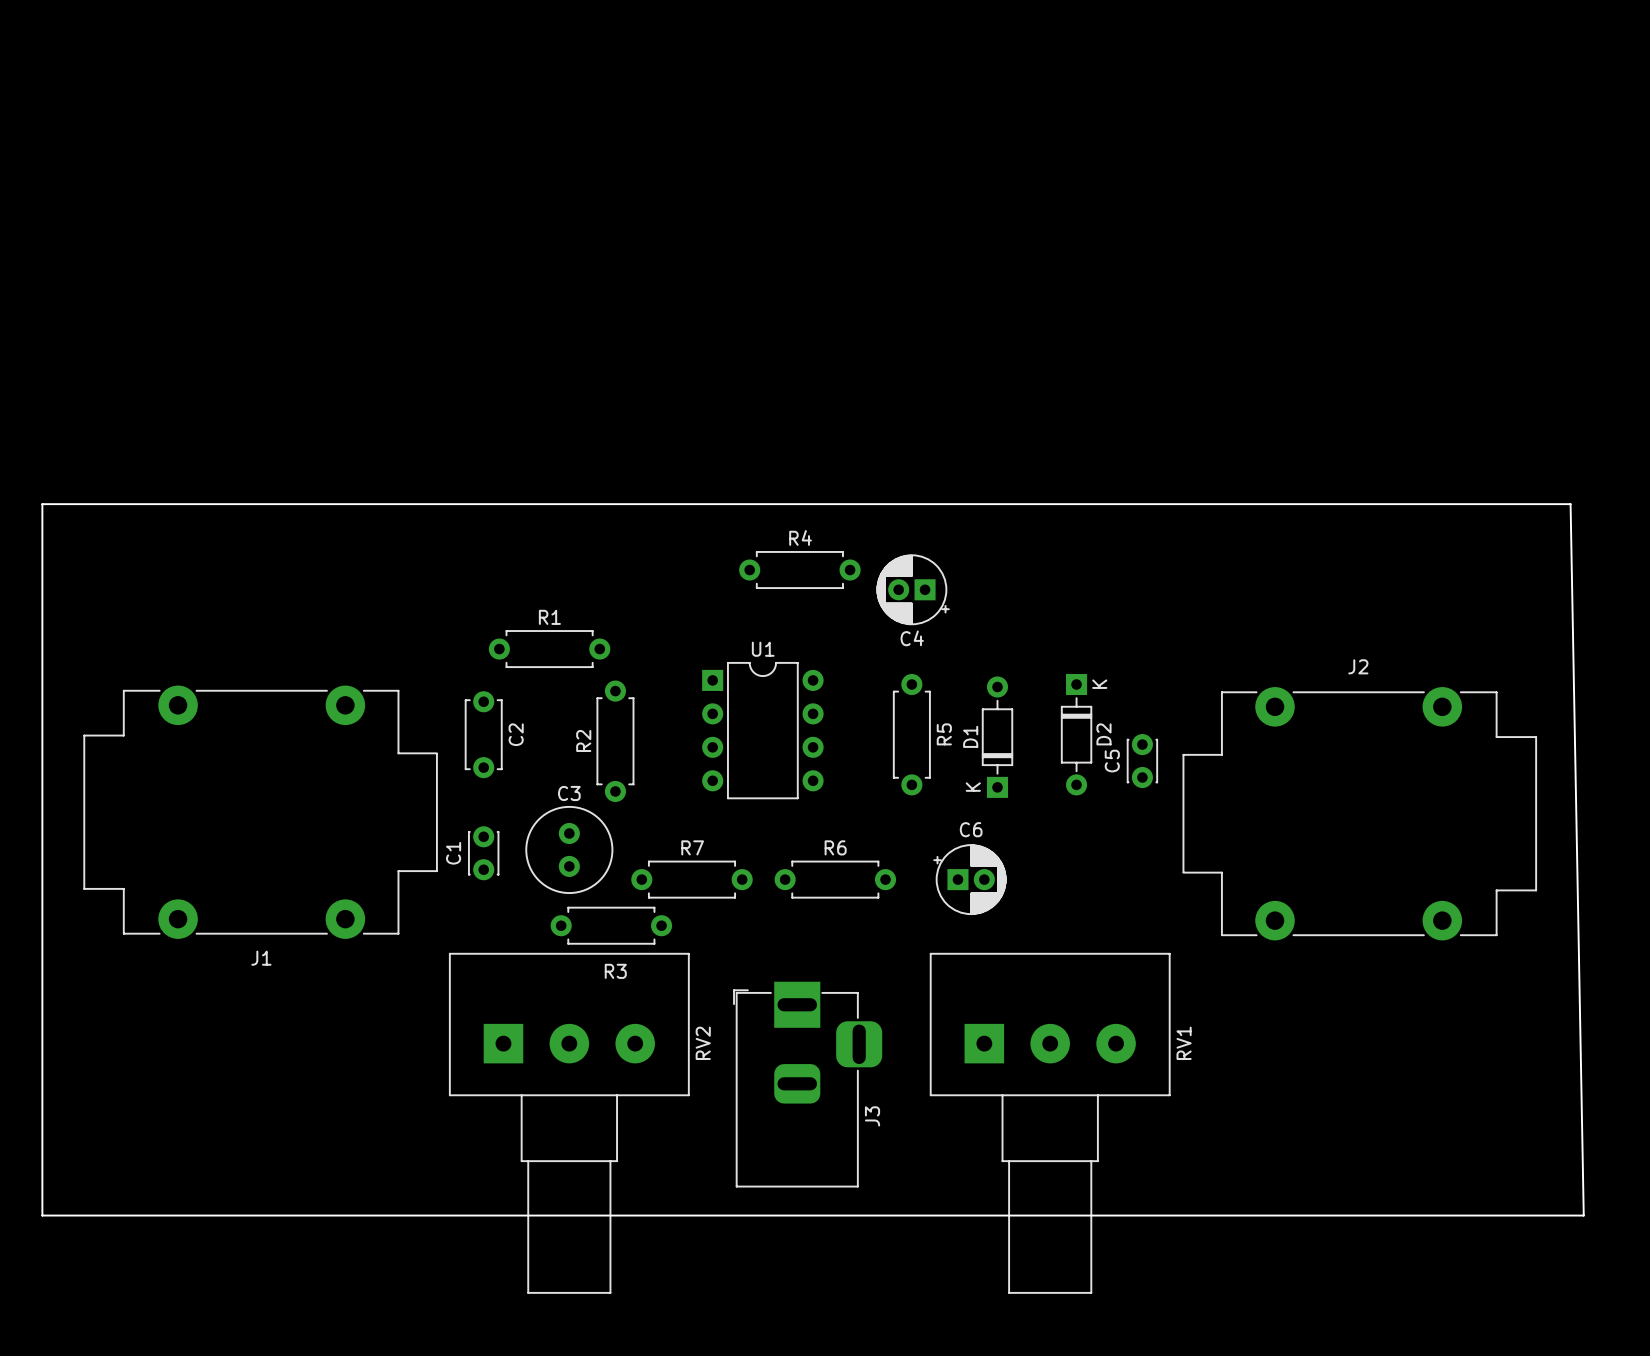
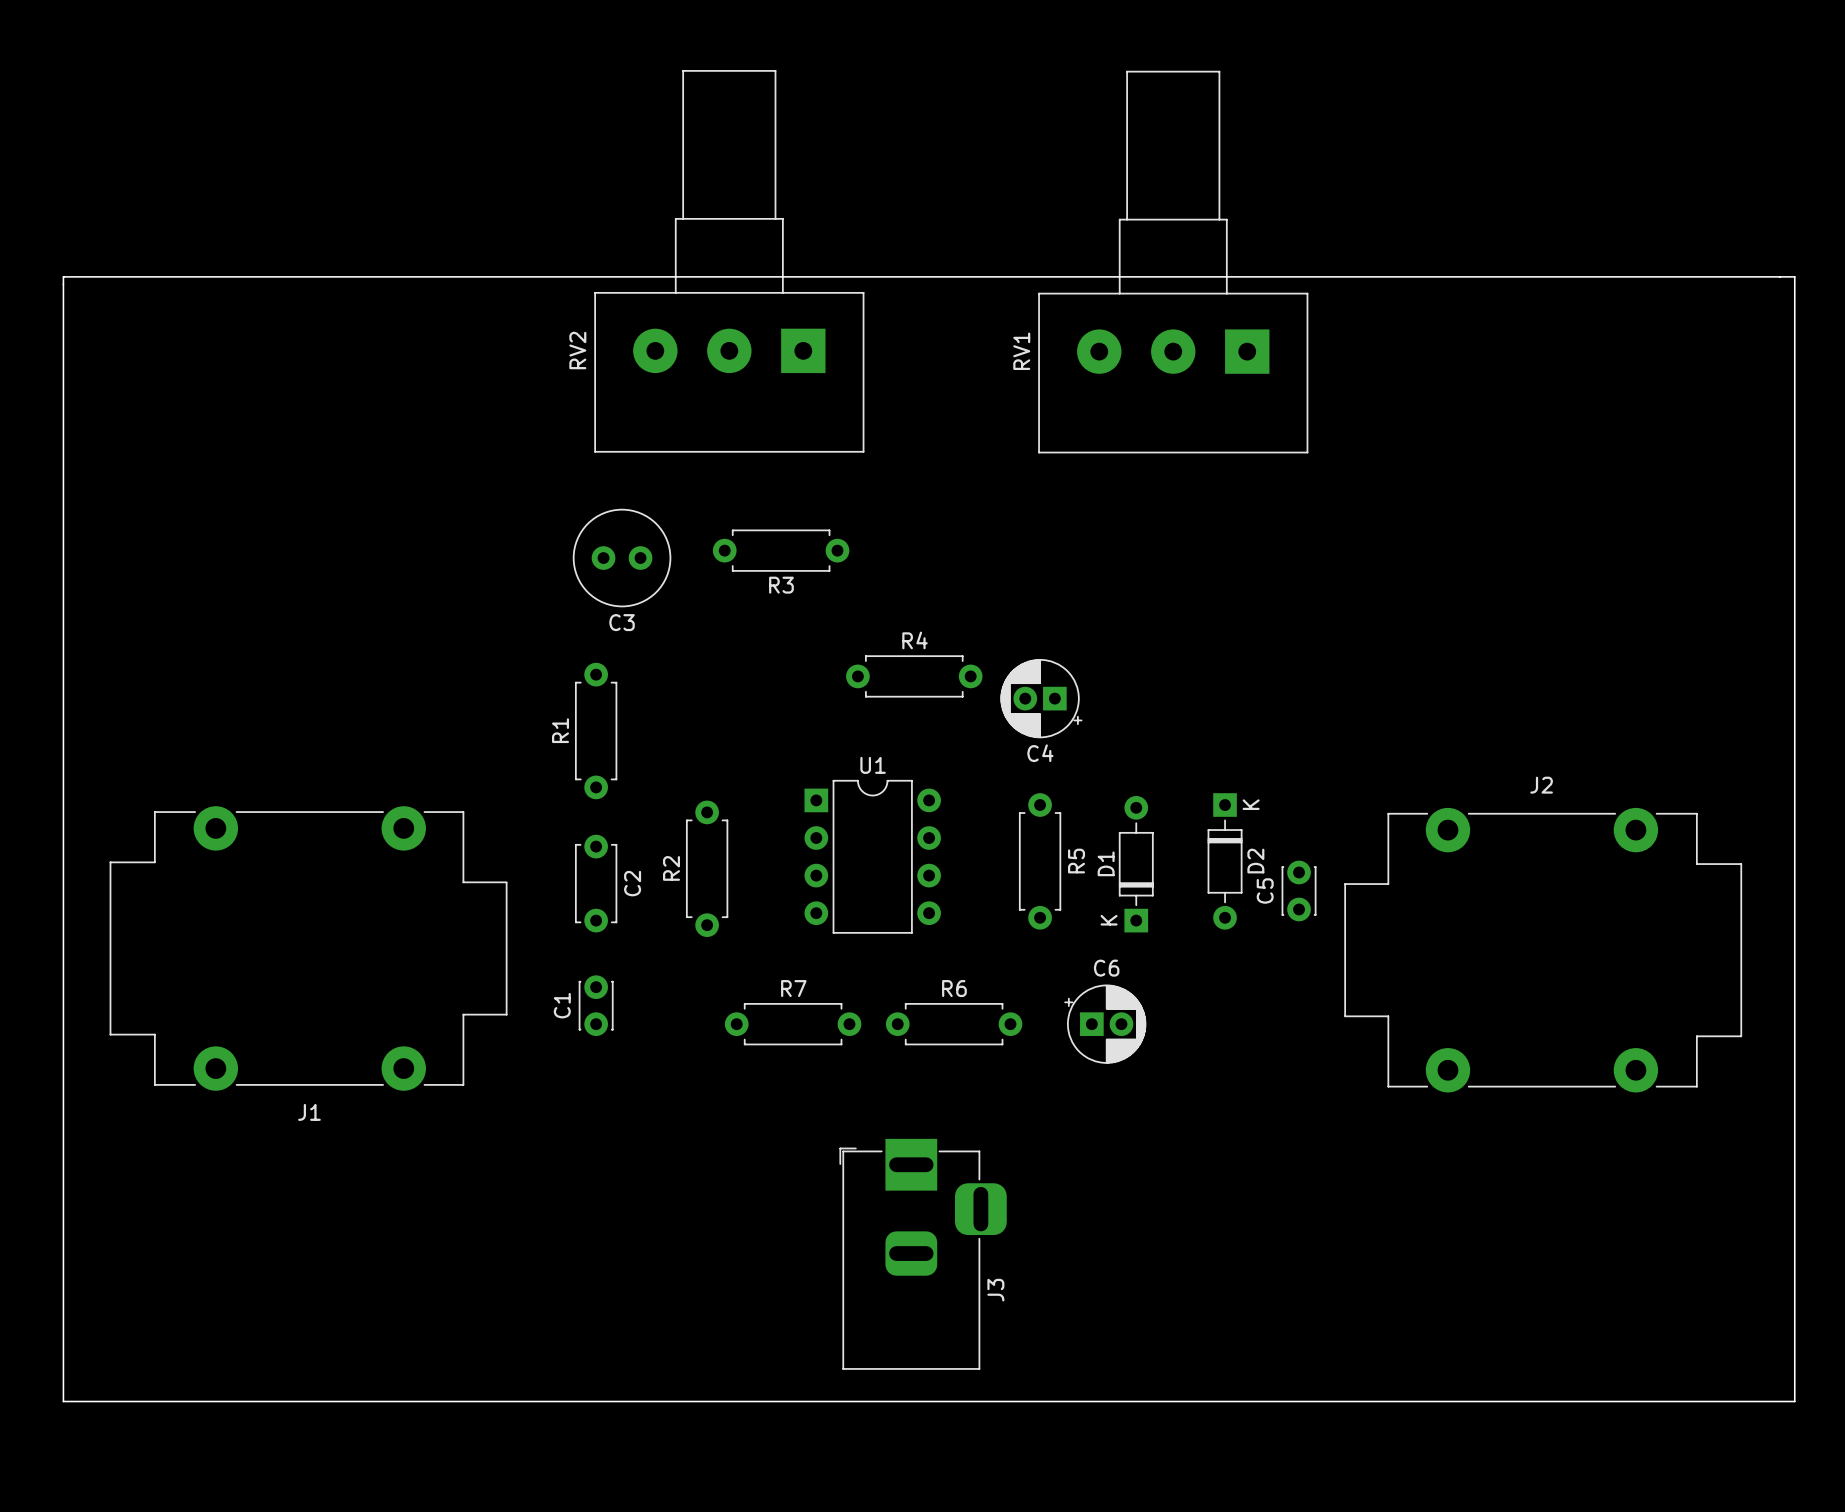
board edge: (42, 504) (1570, 504) (1583, 1215) -> (63, 602) (63, 276) (1794, 276) (1794, 1401)
R1 name position: R1 (549, 617) -> R1 (560, 730)
R1 rotation: 0° (549, 649) -> 90° clockwise (596, 731)
C2 position: (483, 734) -> (596, 883)
C3 name position: C3 (569, 793) -> C3 (622, 622)
C3 rotation: 0° (569, 849) -> 90° clockwise (622, 558)
C3 position: (569, 849) -> (622, 558)
C1 position: (483, 853) -> (596, 1005)
R3 position: (611, 925) -> (781, 550)
R3 name position: R3 (615, 971) -> R3 (781, 585)
RV2 rotation: 0° (569, 1123) -> 180° (729, 261)
RV2 position: (569, 1123) -> (729, 261)
RV1 rotation: 0° (1050, 1123) -> 180° (1173, 262)
RV1 position: (1050, 1123) -> (1173, 262)

